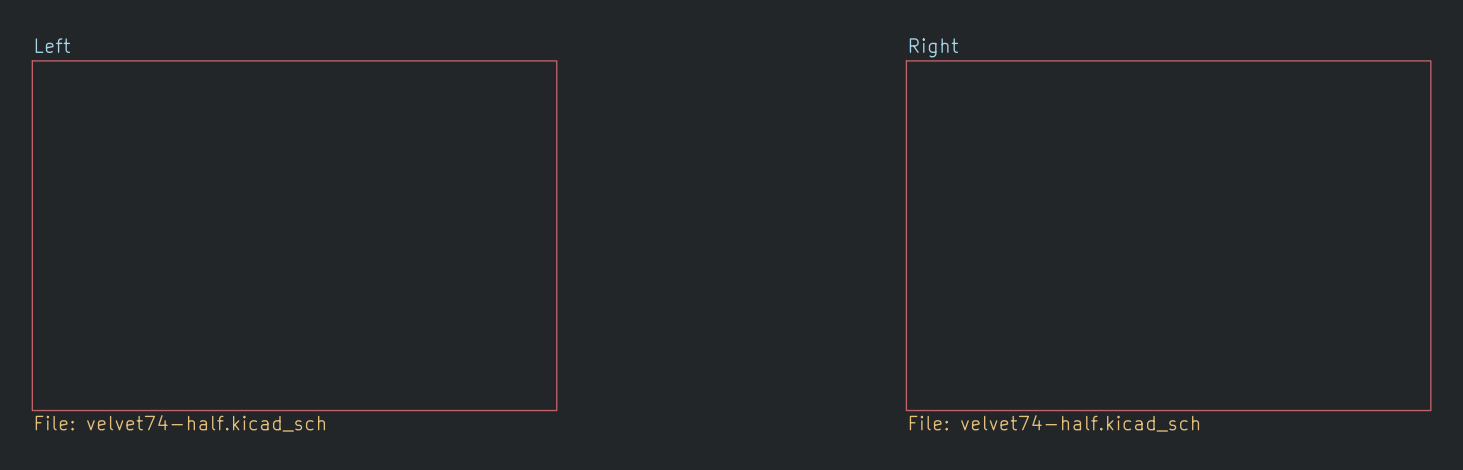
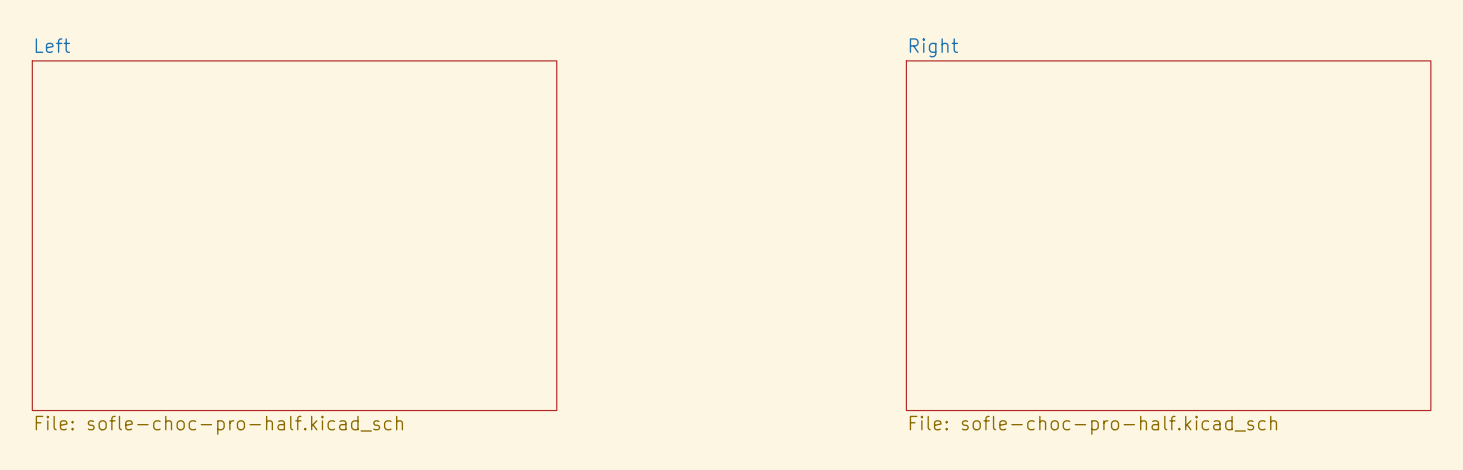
sheet Left value: File: velvet74-half.kicad_sch (180, 423) -> File: sofle-choc-pro-half.kicad_sch (219, 425)
sheet Right value: File: velvet74-half.kicad_sch (1054, 423) -> File: sofle-choc-pro-half.kicad_sch (1093, 425)

